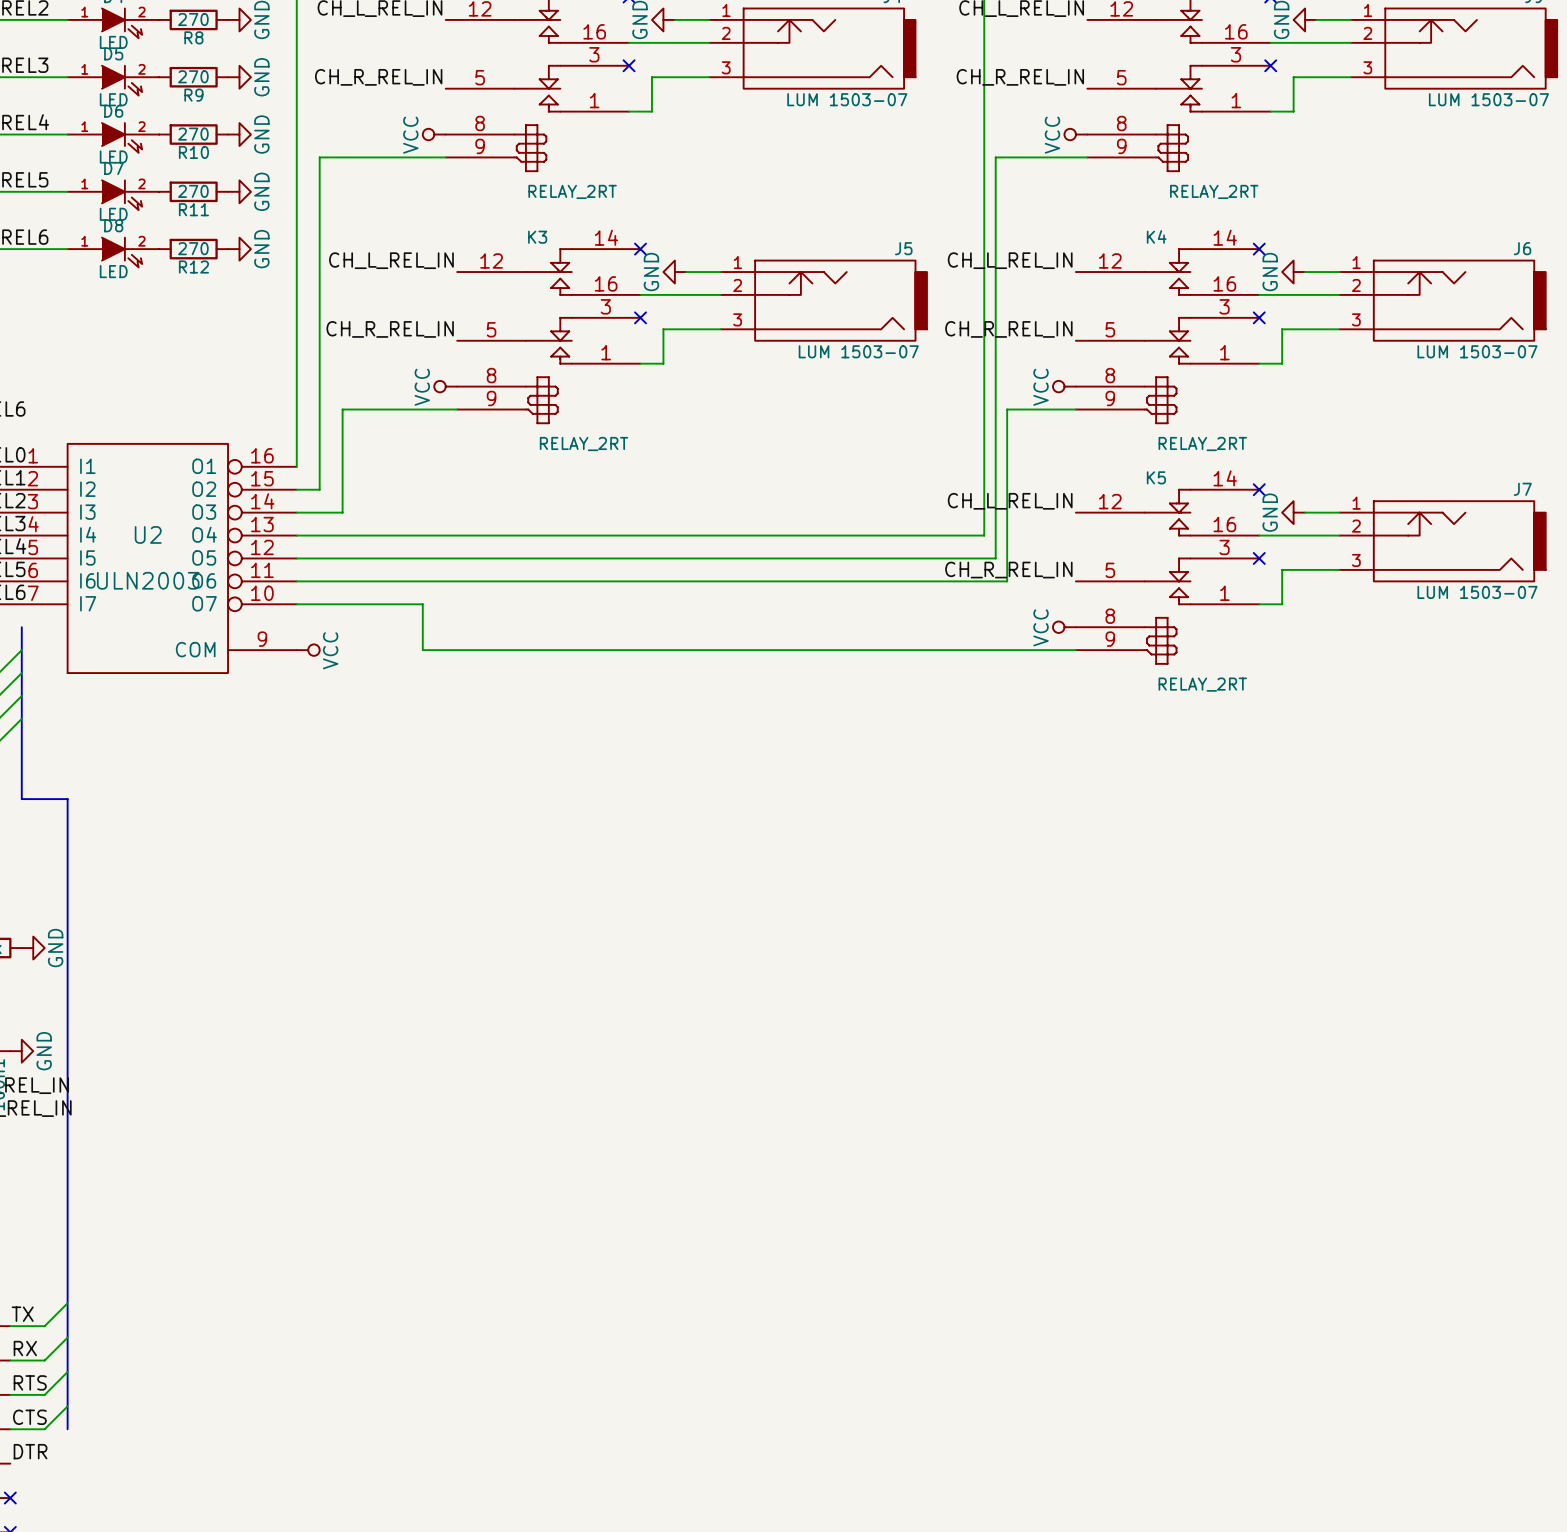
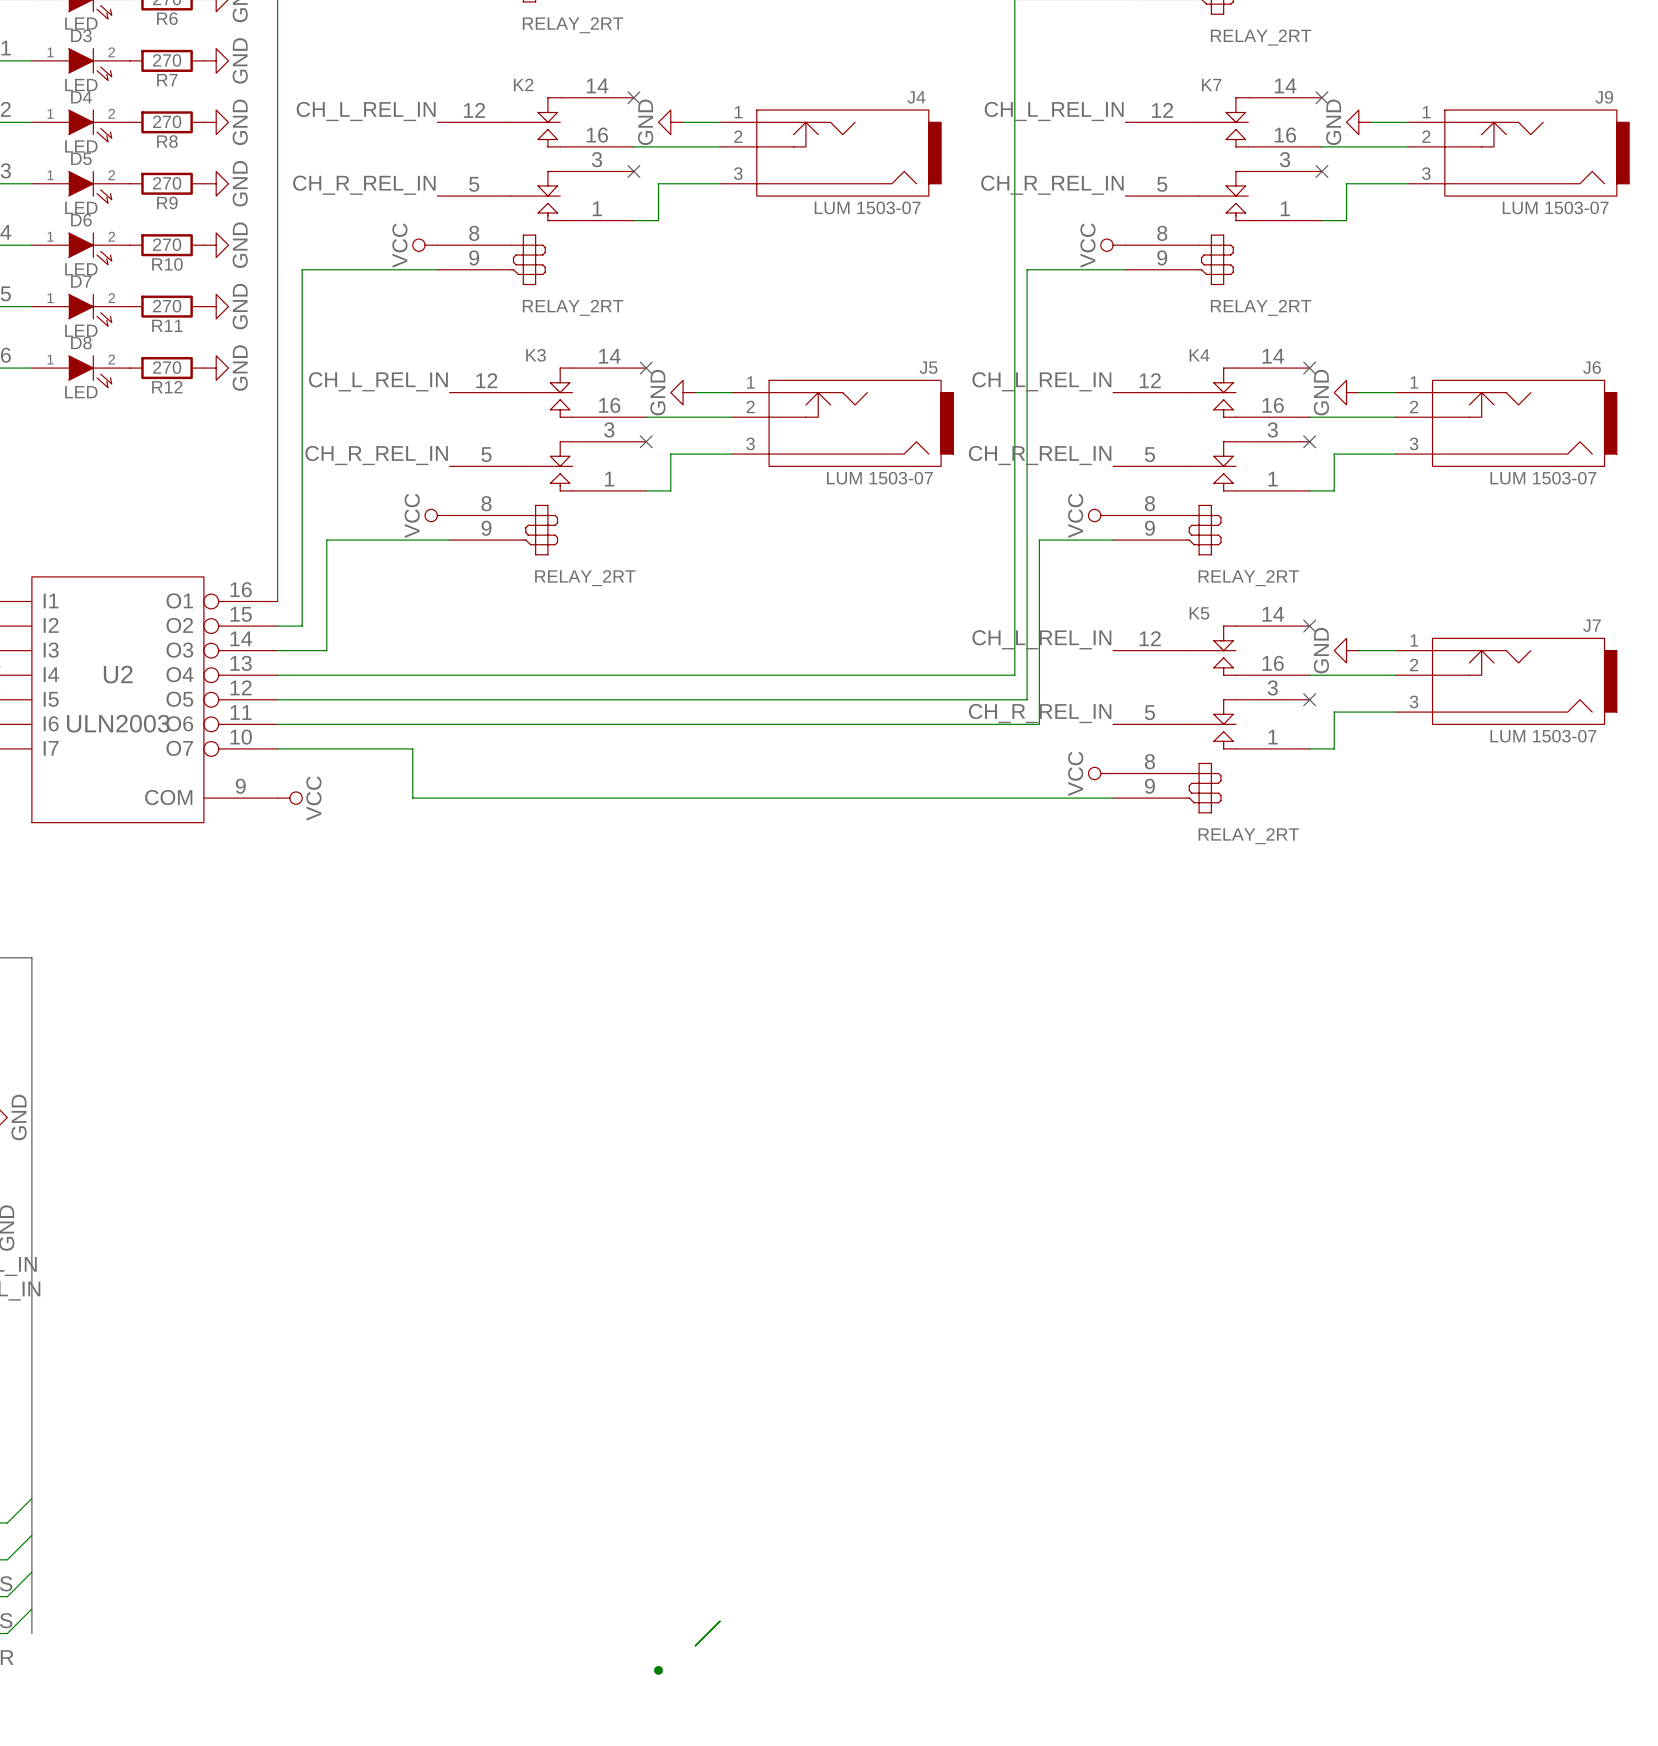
wire: none -> (719, 1621) (695, 1645)
junction: none -> (658, 1670)

